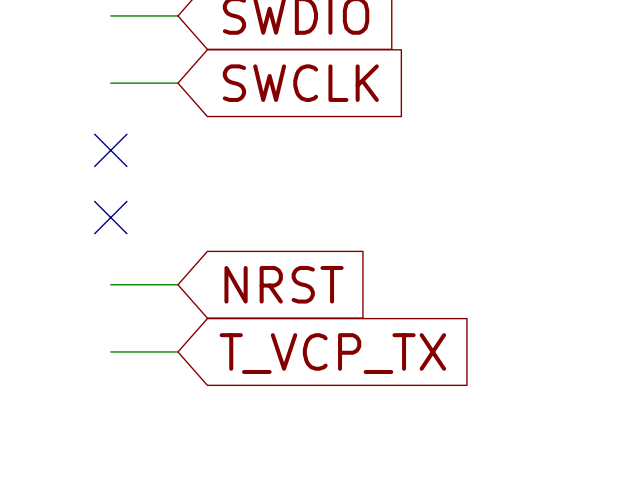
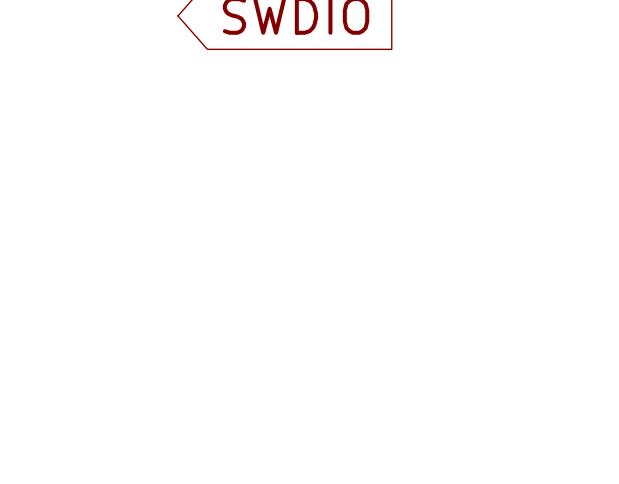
wire: (110, 15) (177, 15) -> none
wire: (110, 83) (177, 83) -> none
global label: SWCLK (300, 83) -> none
no-connect mark: (110, 150) -> none
no-connect mark: (110, 217) -> none
wire: (110, 284) (177, 284) -> none
global label: NRST (284, 284) -> none
wire: (110, 351) (177, 351) -> none
global label: T_VCP_TX (332, 353) -> none

